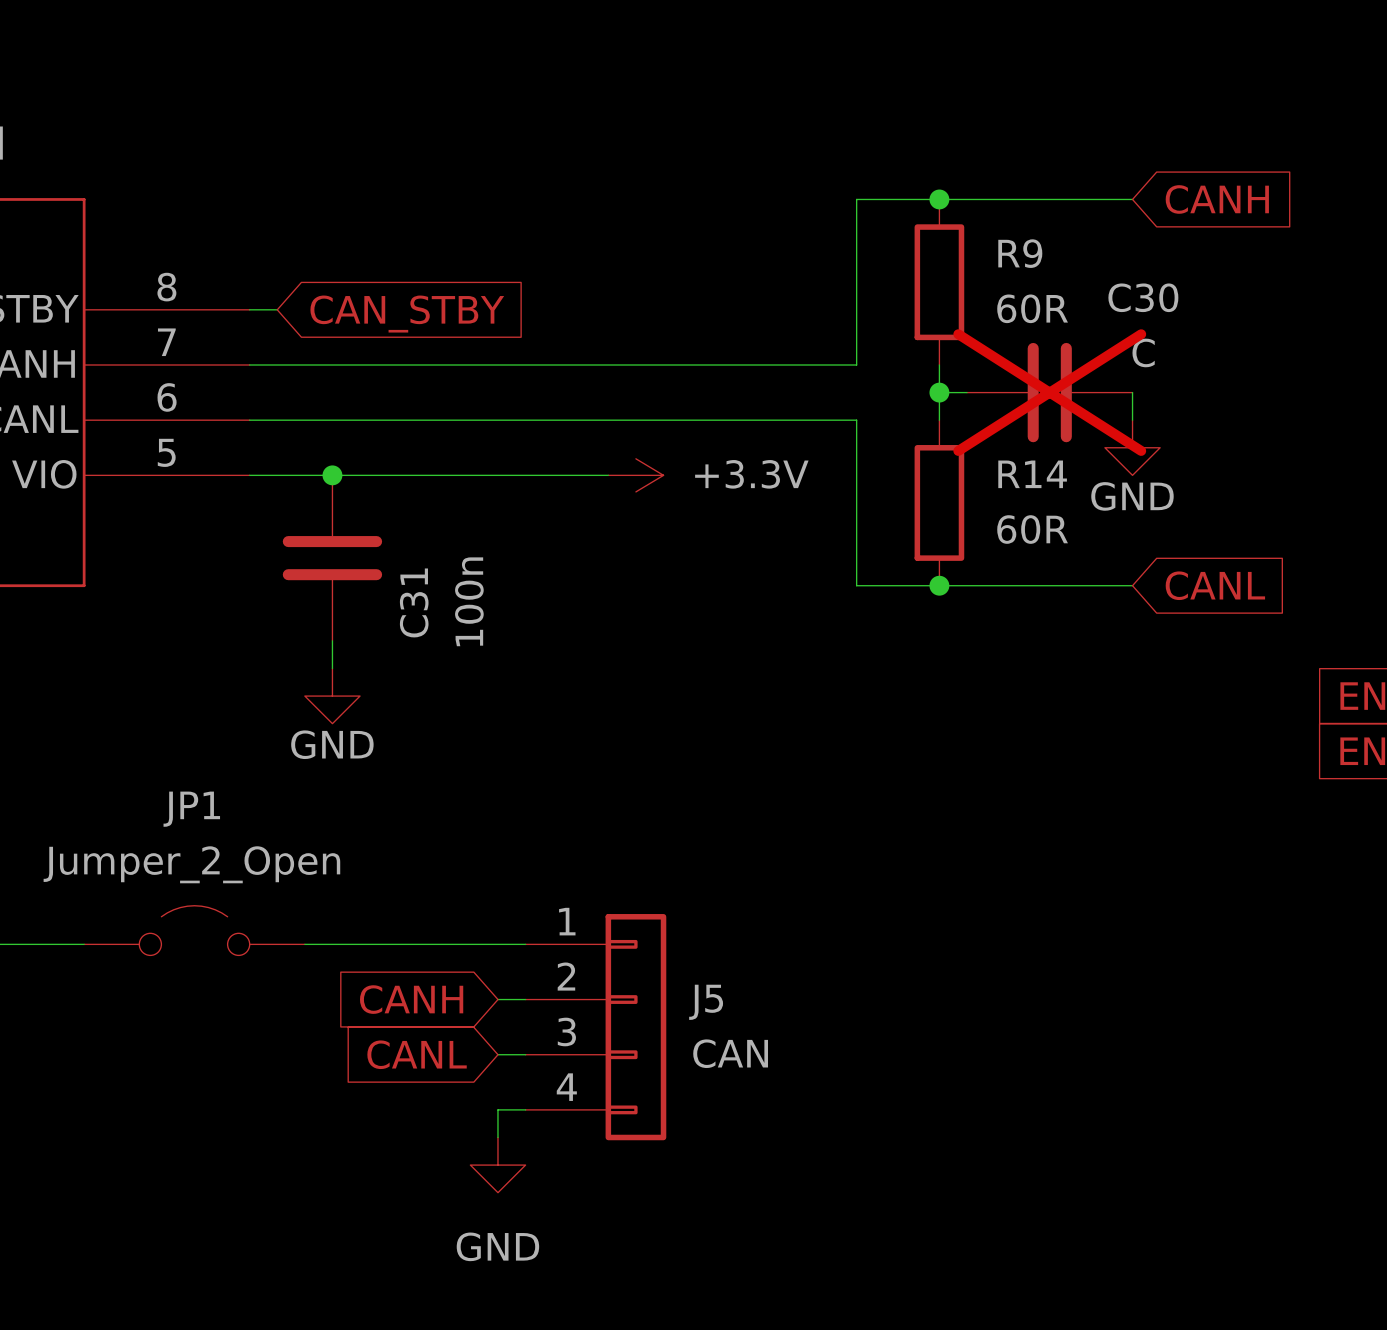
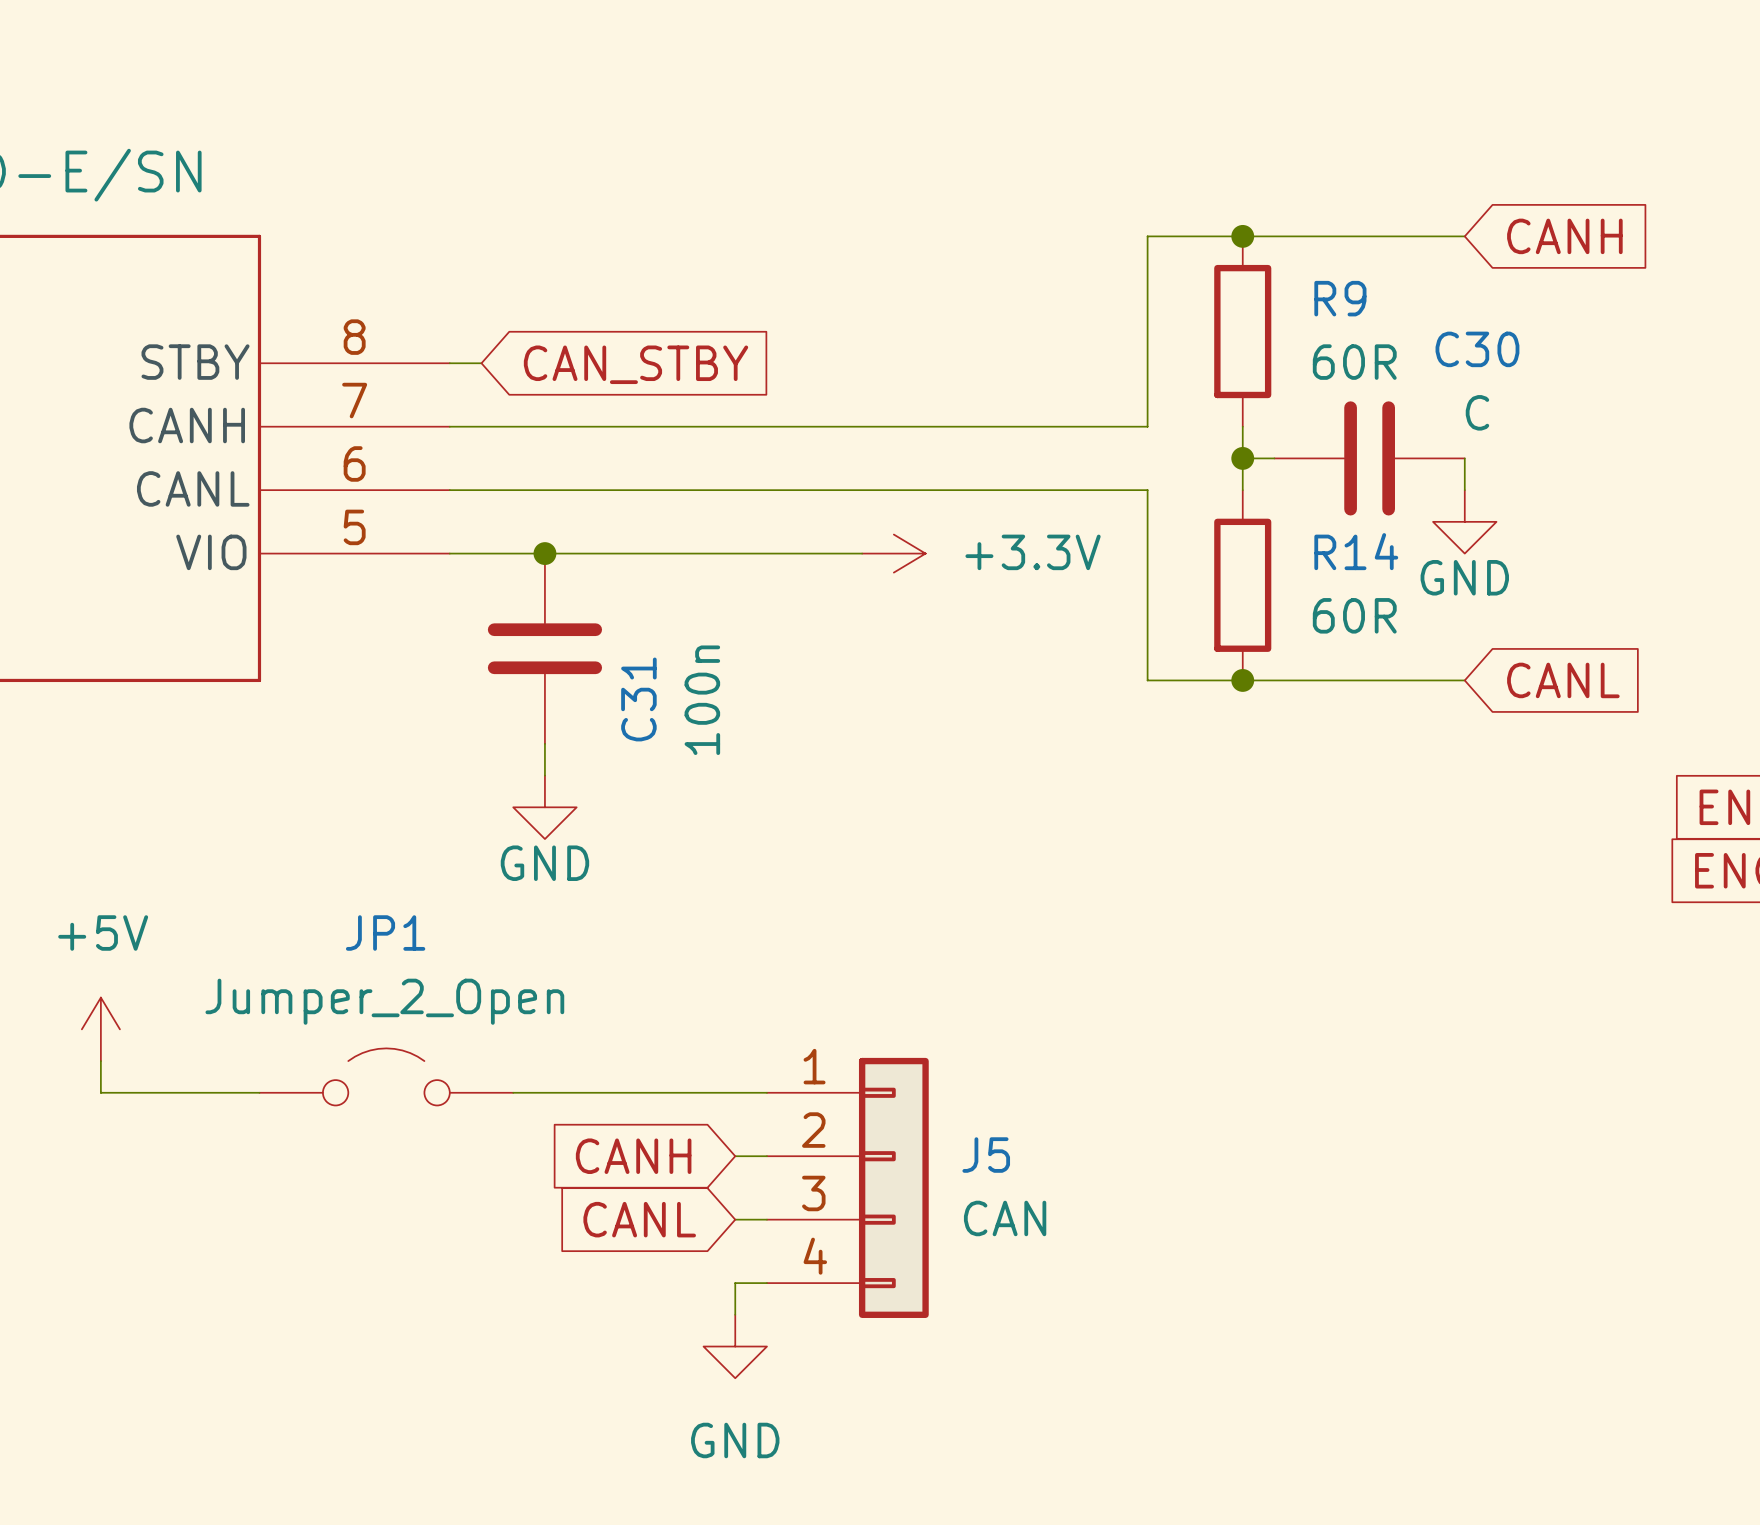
C30 do-not-place cross: (1049, 392) -> none

